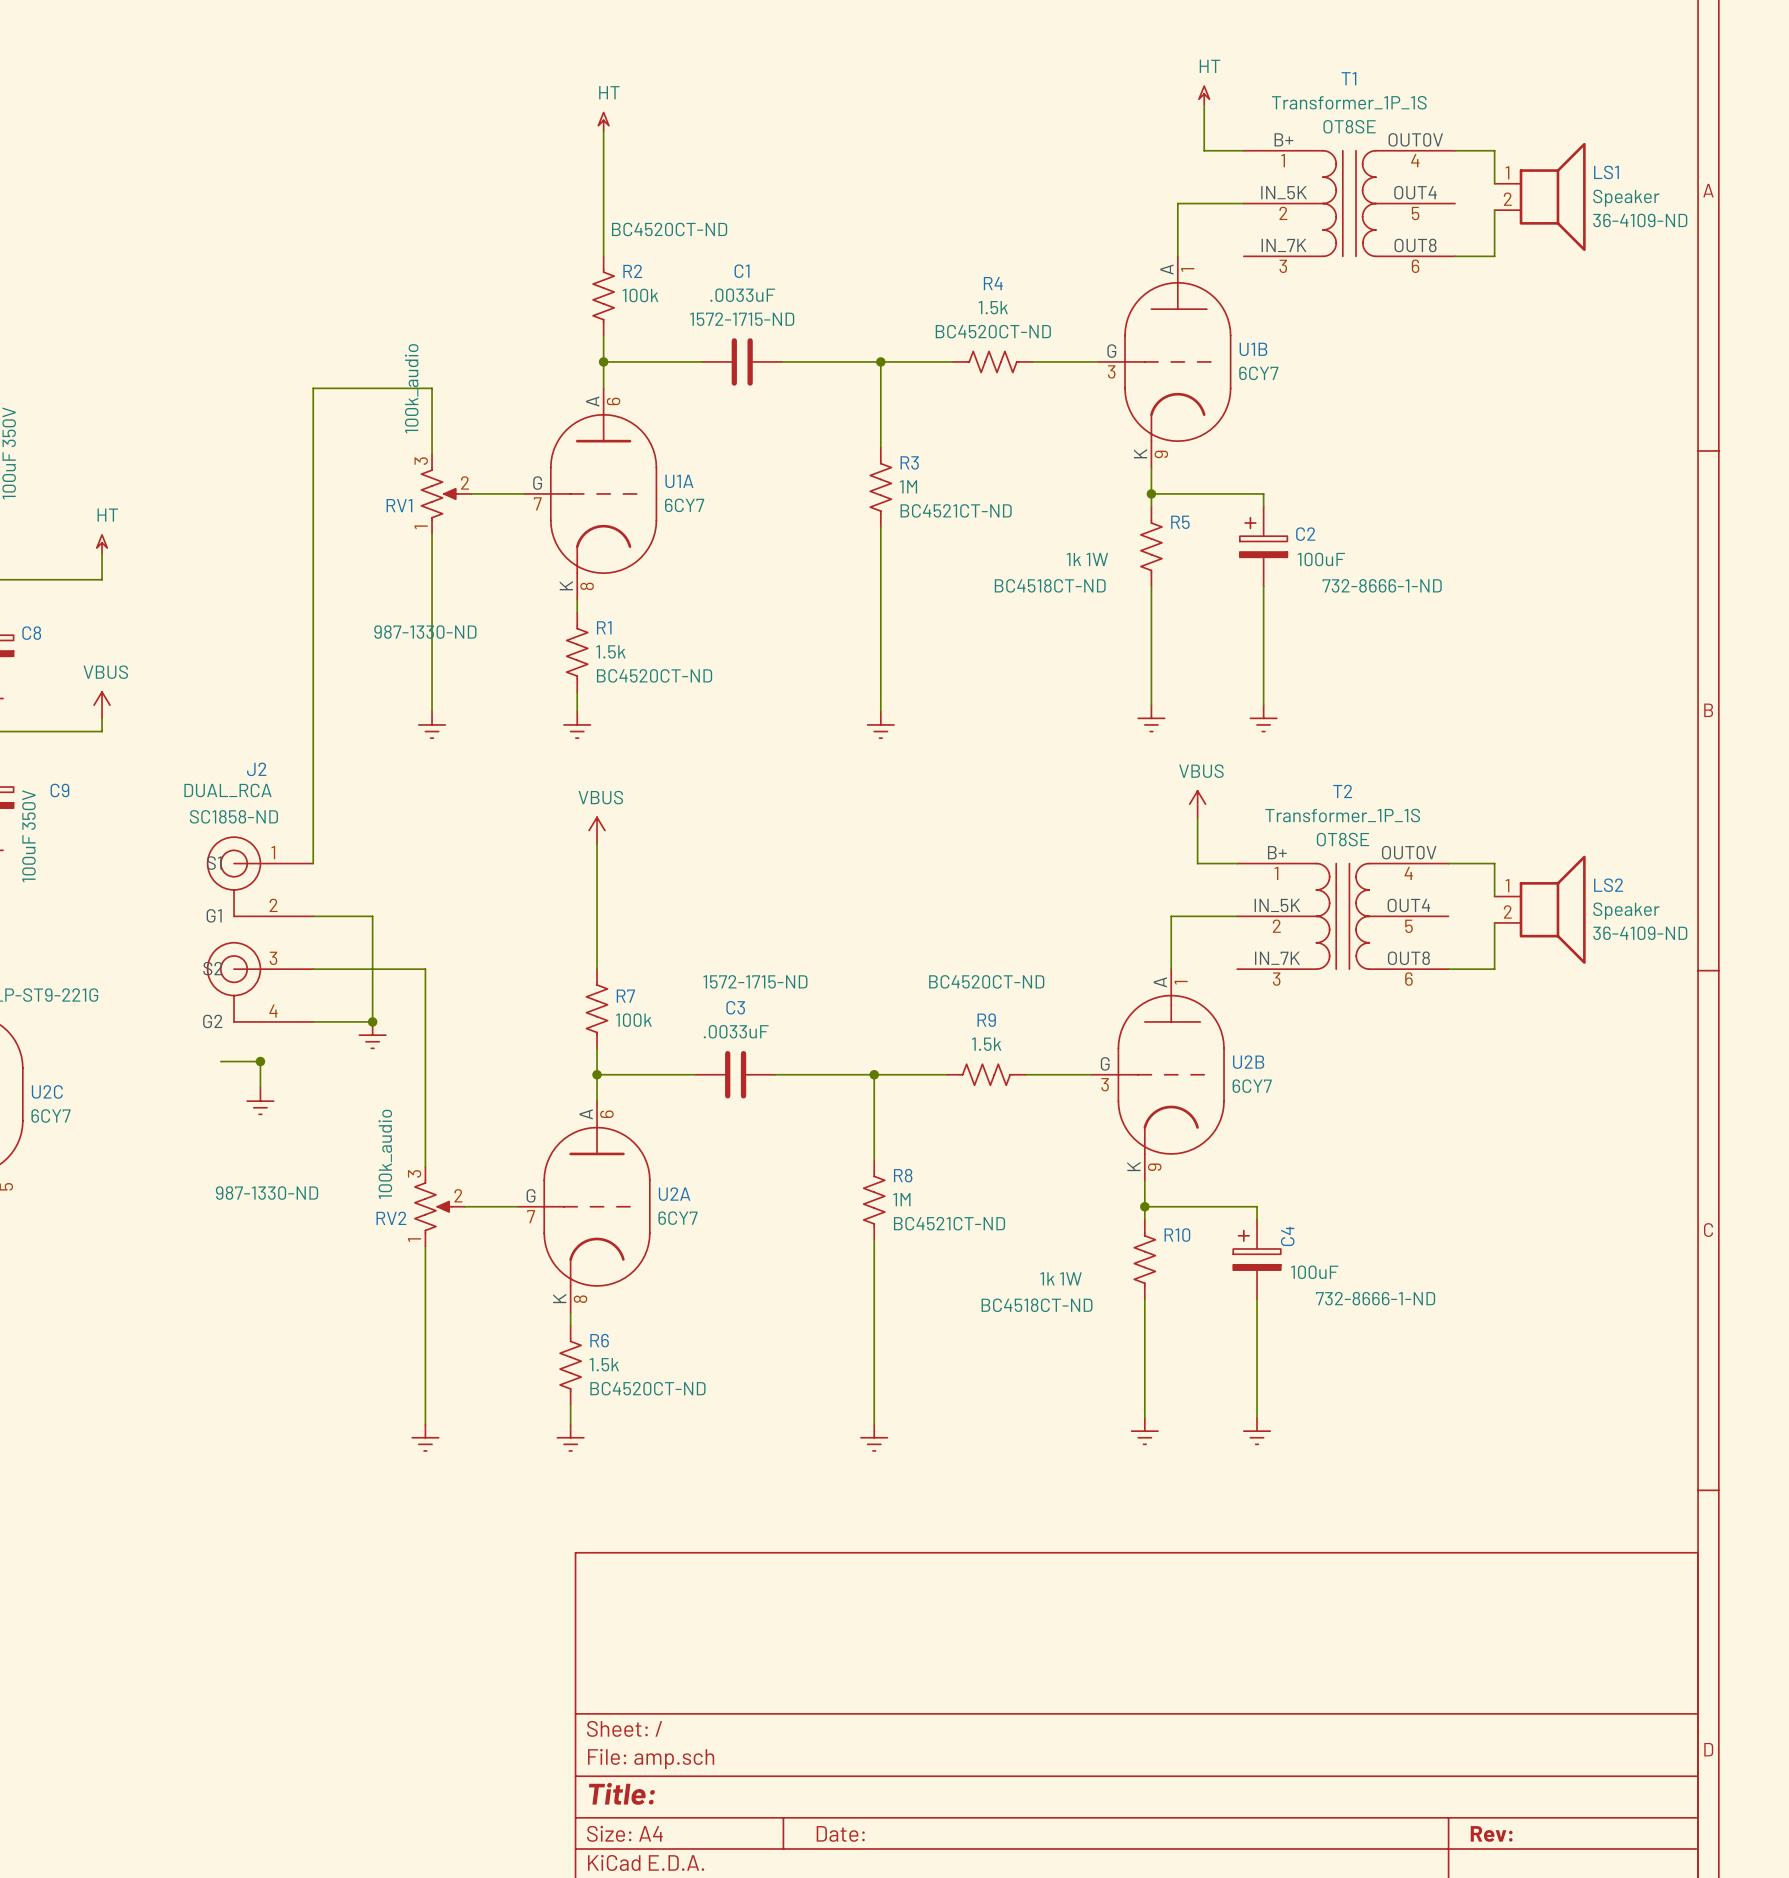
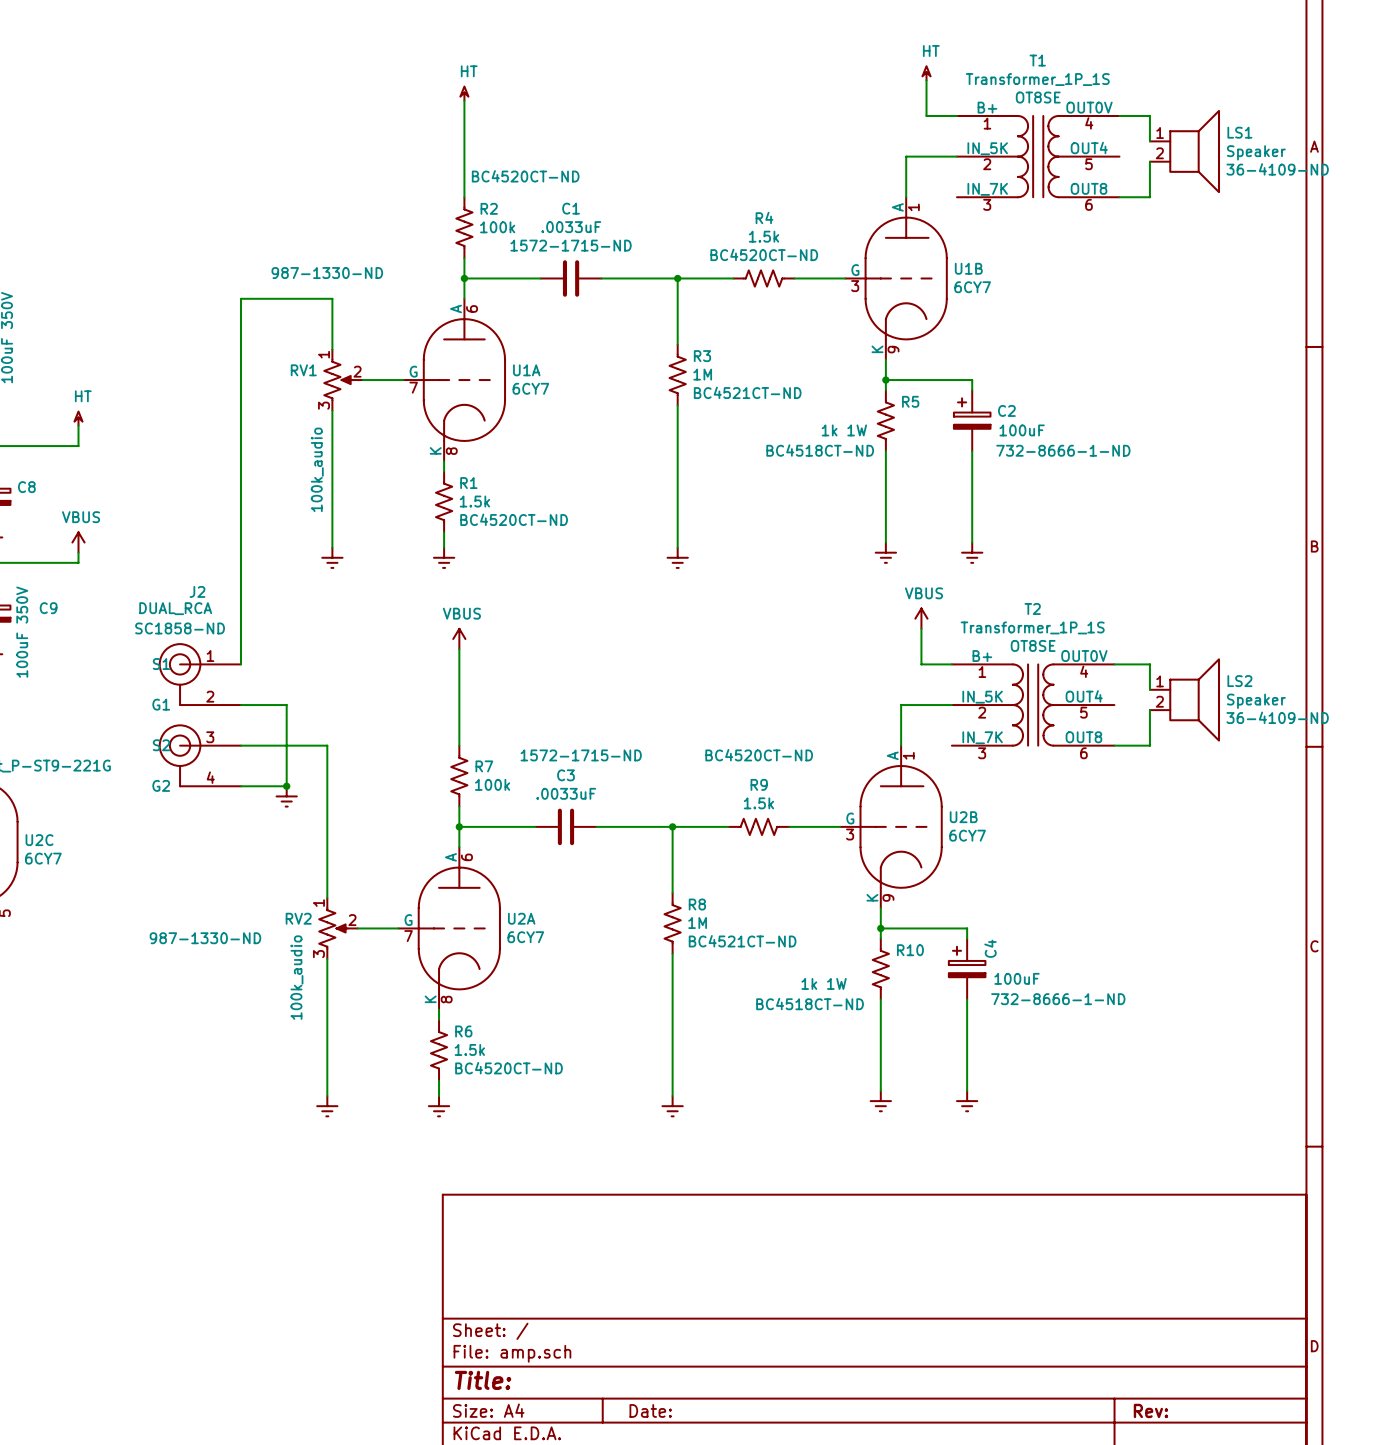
RV1 flip: as is (439, 493) -> up-down (338, 380)
wire: (220, 1061) (260, 1061) (260, 1087) -> none
junction: (260, 1061) -> none
power symbol: (260, 1101) -> none
RV2 flip: as is (433, 1206) -> up-down (333, 928)

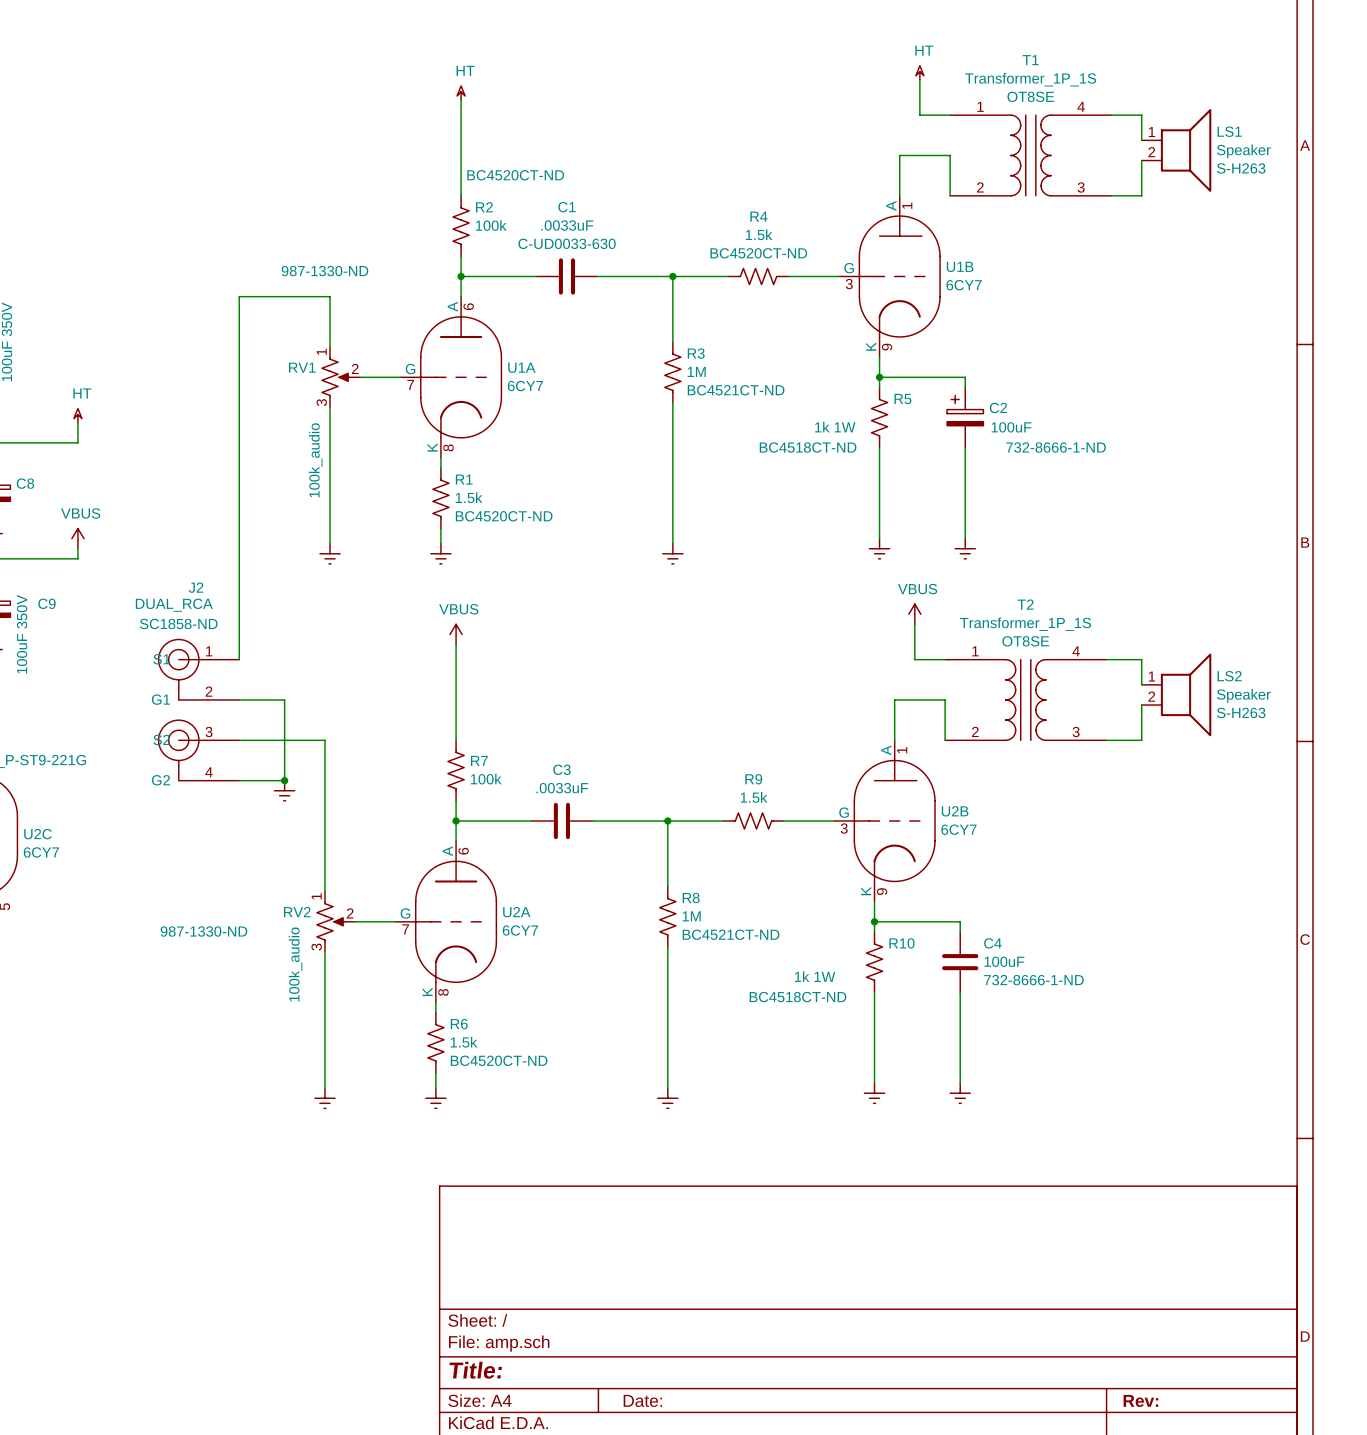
T1 symbol: [956, 115, 1120, 198] -> [950, 115, 1112, 196]
wire: none -> (950, 155) (950, 195)
LS1 text: 36-4109-ND (1277, 169) -> S-H263 (1241, 168)
C1 text: 1572-1715-ND (571, 245) -> C-UD0033-630 (567, 243)
T2 symbol: [951, 664, 1115, 746] -> [945, 659, 1107, 741]
wire: none -> (945, 699) (945, 740)
LS2 text: 36-4109-ND (1277, 717) -> S-H263 (1241, 712)
C3 text: 1572-1715-ND (581, 755) -> none
R9 text: BC4520CT-ND (759, 755) -> none
C4 symbol: [948, 938, 986, 1000] -> [942, 931, 979, 993]

